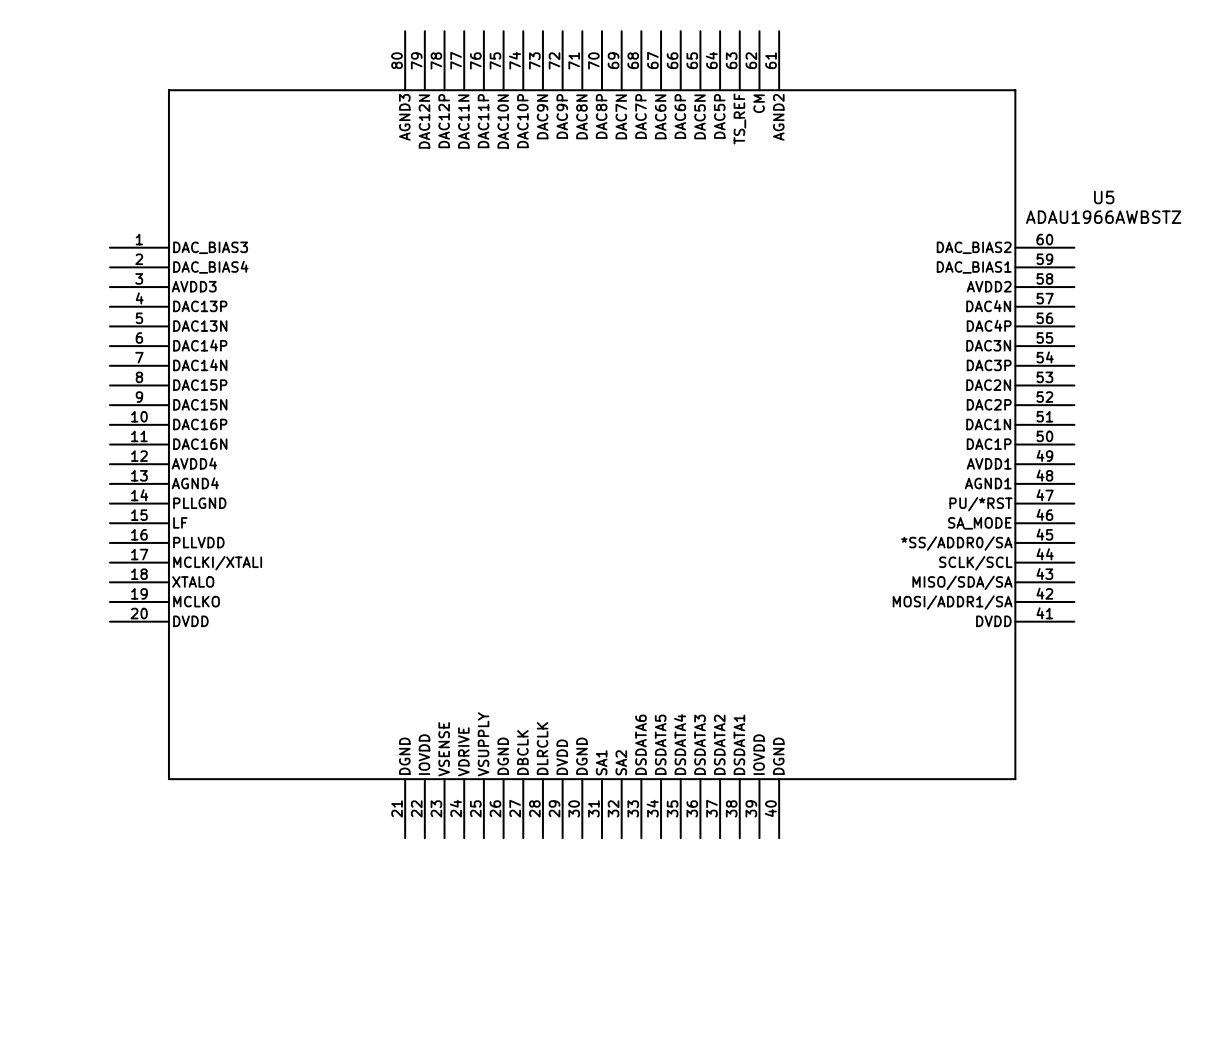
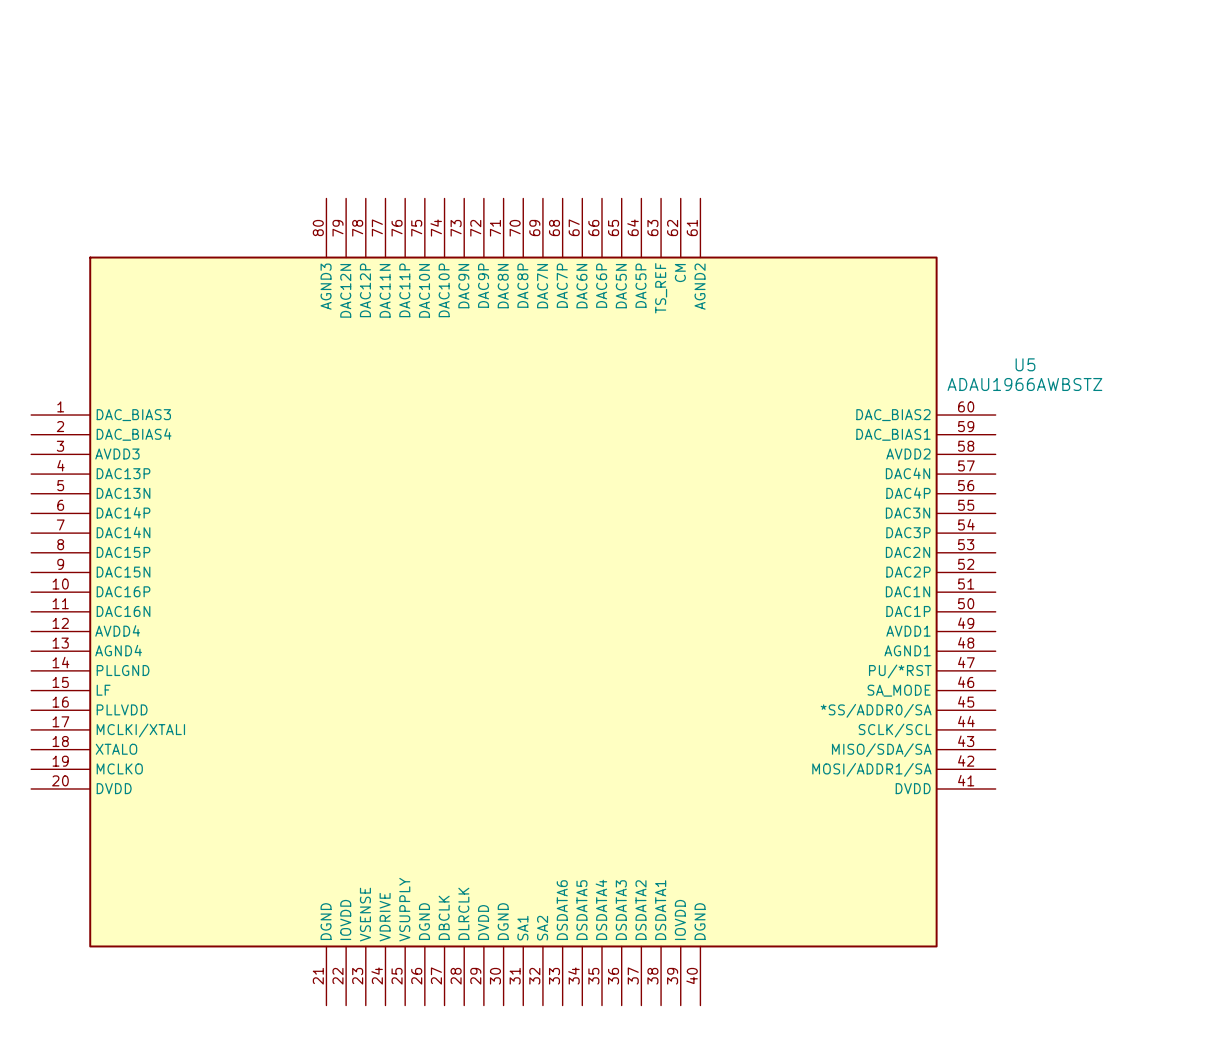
U5 symbol: [109, 31, 1075, 839] -> [31, 198, 996, 1006]

